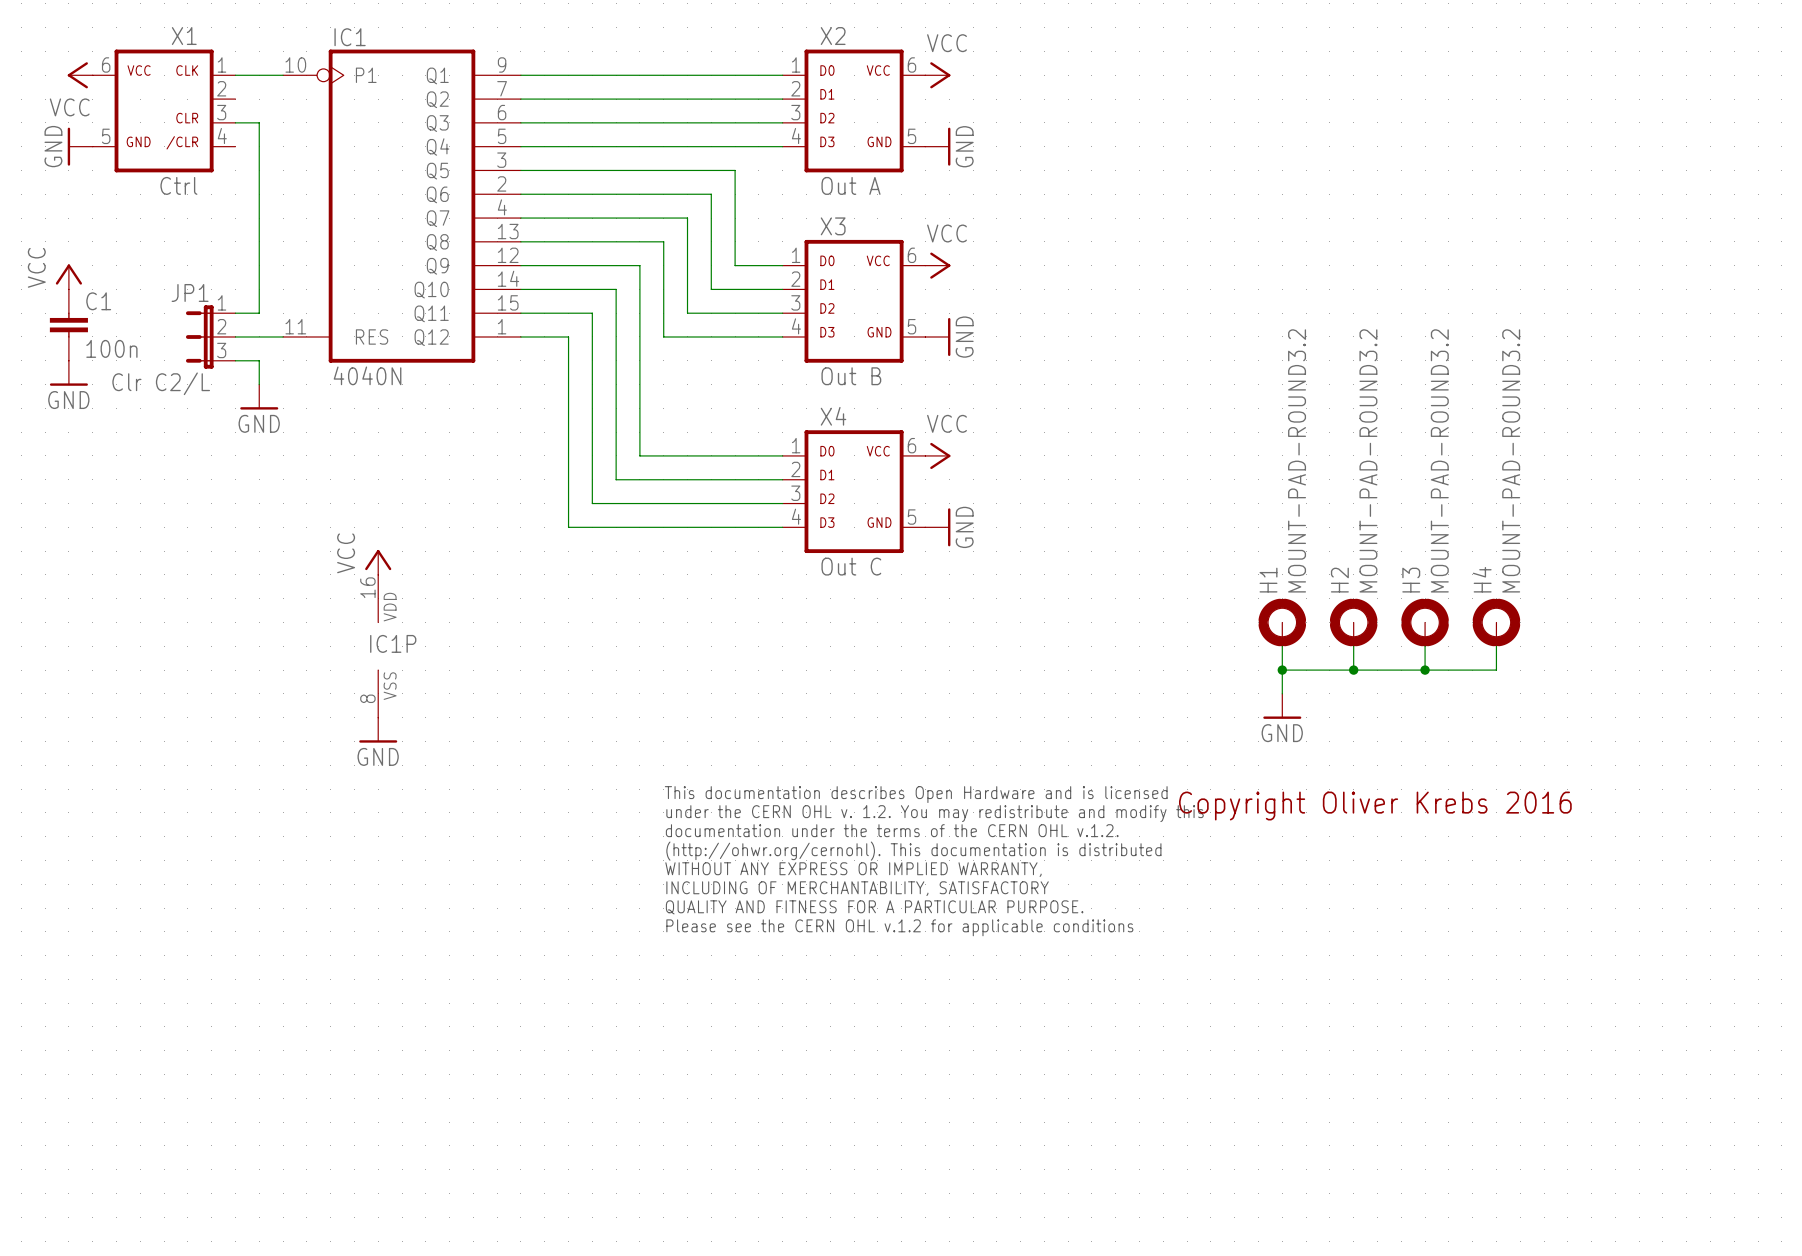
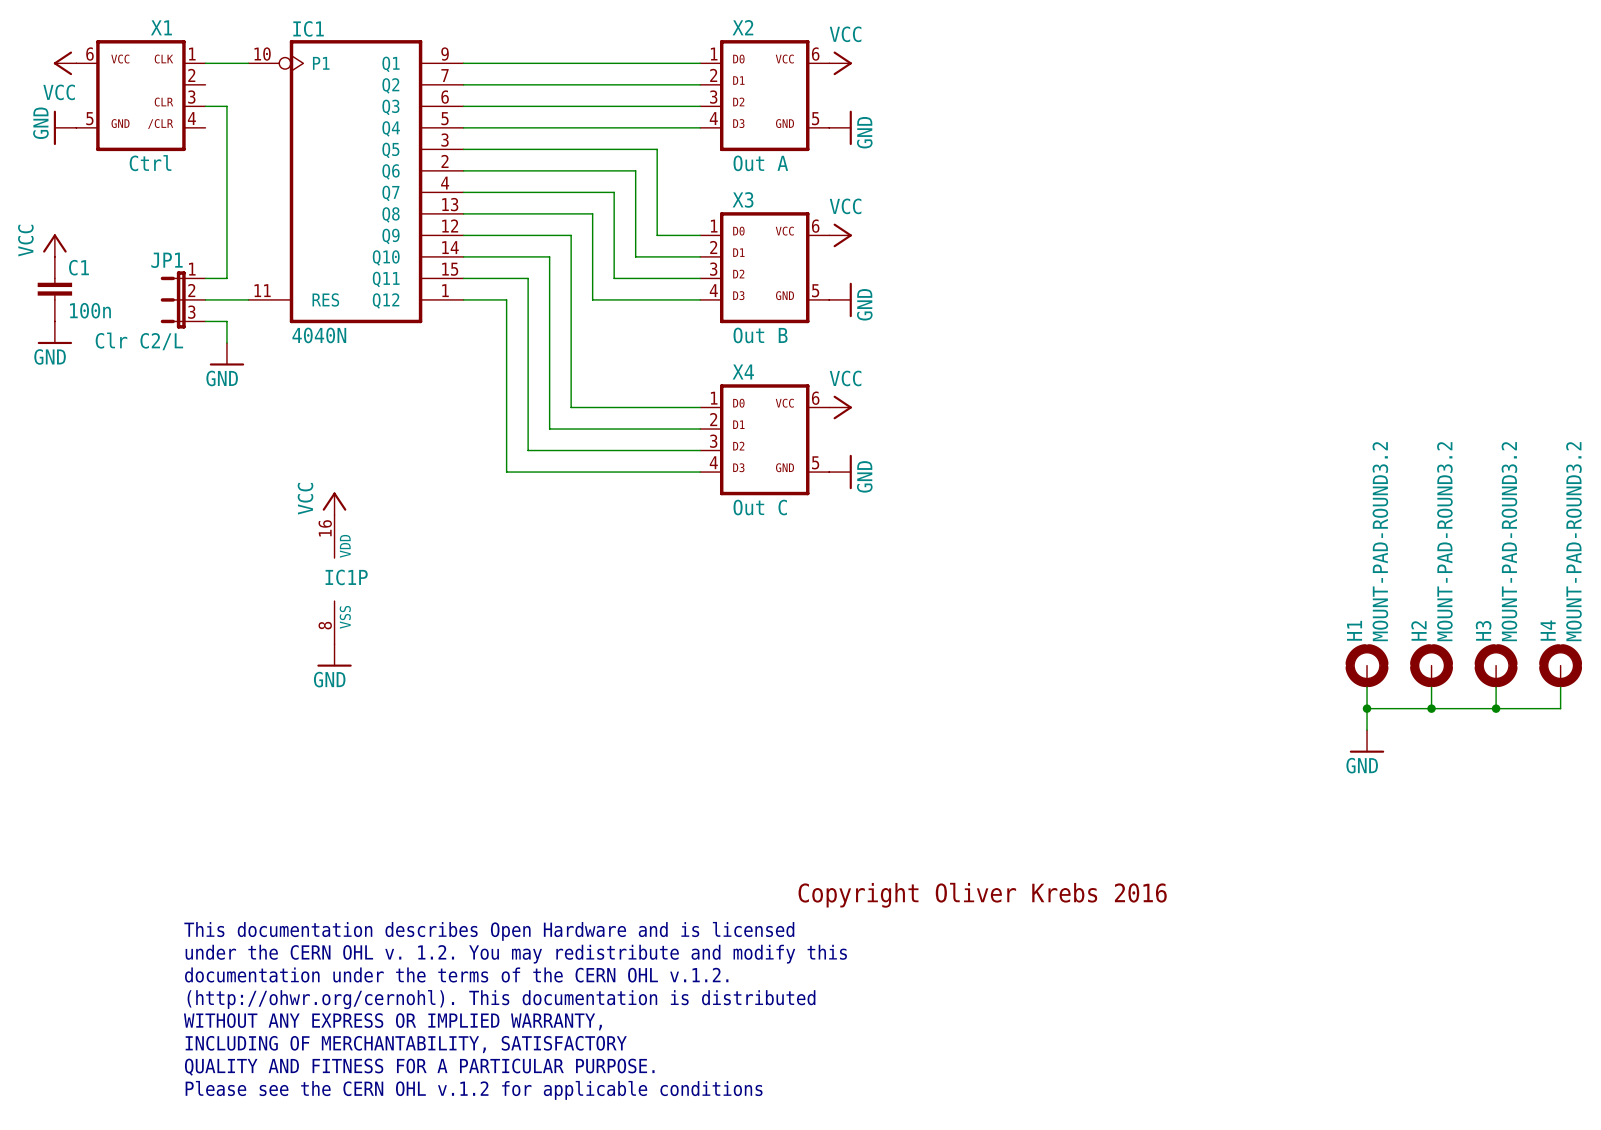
H1 position: (1282, 622) -> (1367, 665)
H2 position: (1353, 622) -> (1431, 665)
H3 position: (1425, 622) -> (1496, 665)
H4 position: (1496, 622) -> (1560, 665)
wire: (1282, 646) (1282, 693) -> none
wire: (1353, 646) (1353, 670) -> none
wire: (1425, 646) (1425, 670) -> (1431, 687) (1431, 708)
wire: (1496, 646) (1496, 670) (1282, 670) -> none
junction: (1282, 670) -> none
junction: (1353, 670) -> none
junction: (1425, 670) -> none
power symbol: GND (1282, 706) -> none
wire: none -> (1367, 687) (1367, 730)
wire: none -> (1496, 687) (1496, 708)
wire: none -> (1560, 687) (1560, 708) (1367, 708)
junction: none -> (1367, 708)
junction: none -> (1431, 708)
junction: none -> (1496, 708)
text: This documentation describes Open Hardware and is licensed (916, 794) -> none
text: Copyright Oliver Krebs 2016 (1375, 806) -> none
text: under the CERN OHL v. 1.2. You may redistribute and modify this (935, 813) -> none
power symbol: none -> GND (1367, 741)
text: documentation under the terms of the CERN OHL v.1.2. (892, 830) -> none
text: (http://ohwr.org/cernohl). This documentation is distributed (913, 851) -> none
text: WITHOUT ANY EXPRESS OR IMPLIED WARRANTY, (853, 869) -> none
text: INCLUDING OF MERCHANTABILITY, SATISFACTORY (857, 888) -> none
text: QUALITY AND FITNESS FOR A PARTICULAR PURPOSE. (874, 907) -> none
text: Please see the CERN OHL v.1.2 for applicable conditions (899, 927) -> none
text: none -> Copyright Oliver Krebs 2016 (982, 895)
text: none -> This documentation describes Open Hardware and is licensed (489, 931)
text: none -> under the CERN OHL v. 1.2. You may redistribute and modify this (516, 954)
text: none -> documentation under the terms of the CERN OHL v.1.2. (456, 974)
text: none -> (http://ohwr.org/cernohl). This documentation is distributed (501, 999)
text: none -> WITHOUT ANY EXPRESS OR IMPLIED WARRANTY, (392, 1021)
text: none -> INCLUDING OF MERCHANTABILITY, SATISFACTORY (406, 1044)
text: none -> QUALITY AND FITNESS FOR A PARTICULAR PURPOSE. (419, 1067)
text: none -> Please see the CERN OHL v.1.2 for applicable conditions (474, 1090)

